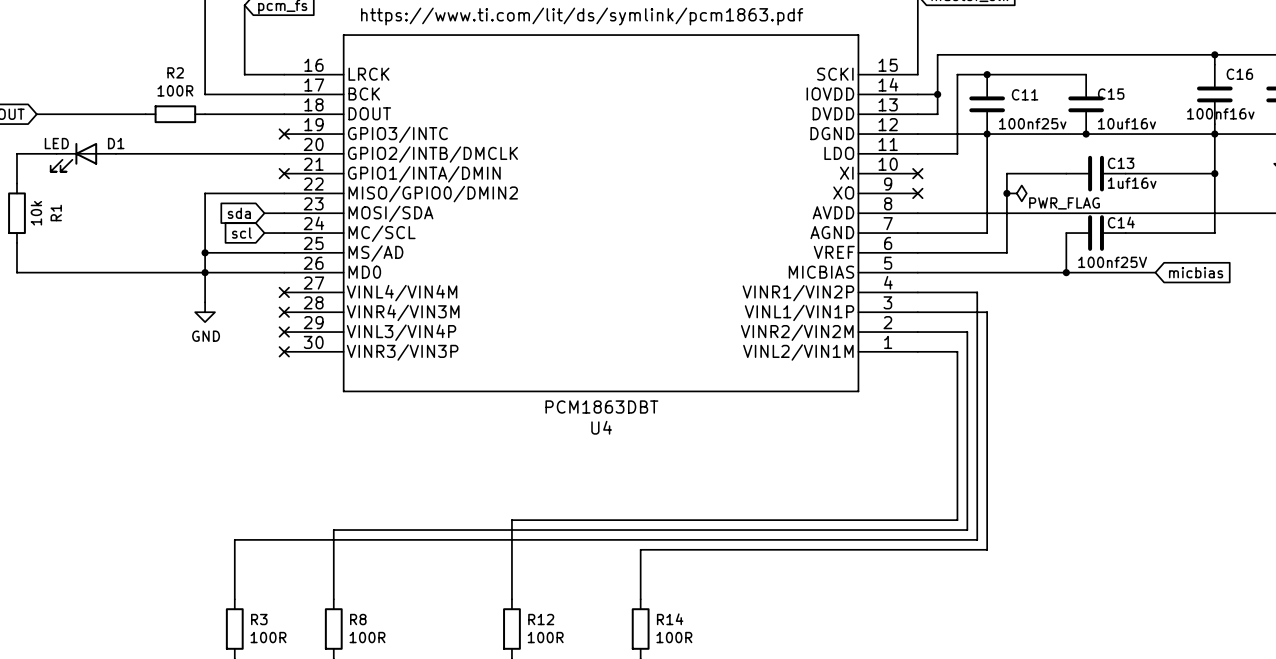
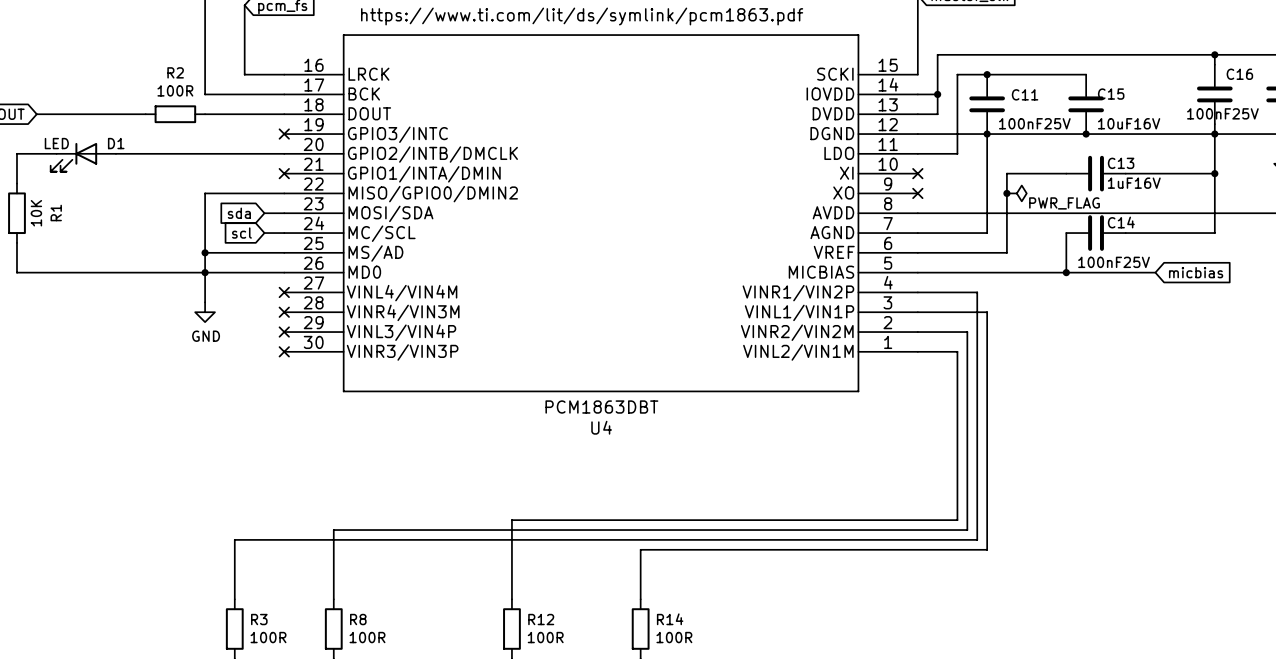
C16 value: 100nf16v (1220, 113) -> 100nF25V (1222, 113)
C11 value: 100nf25v (1032, 123) -> 100nF25V (1034, 123)
C15 value: 10uf16v (1126, 123) -> 10uF16V (1129, 123)
C13 value: 1uf16v (1132, 183) -> 1uF16V (1134, 183)
R1 value: 10k (36, 213) -> 10K (36, 213)
C14 value: 100nf25V (1112, 262) -> 100nF25V (1114, 262)

